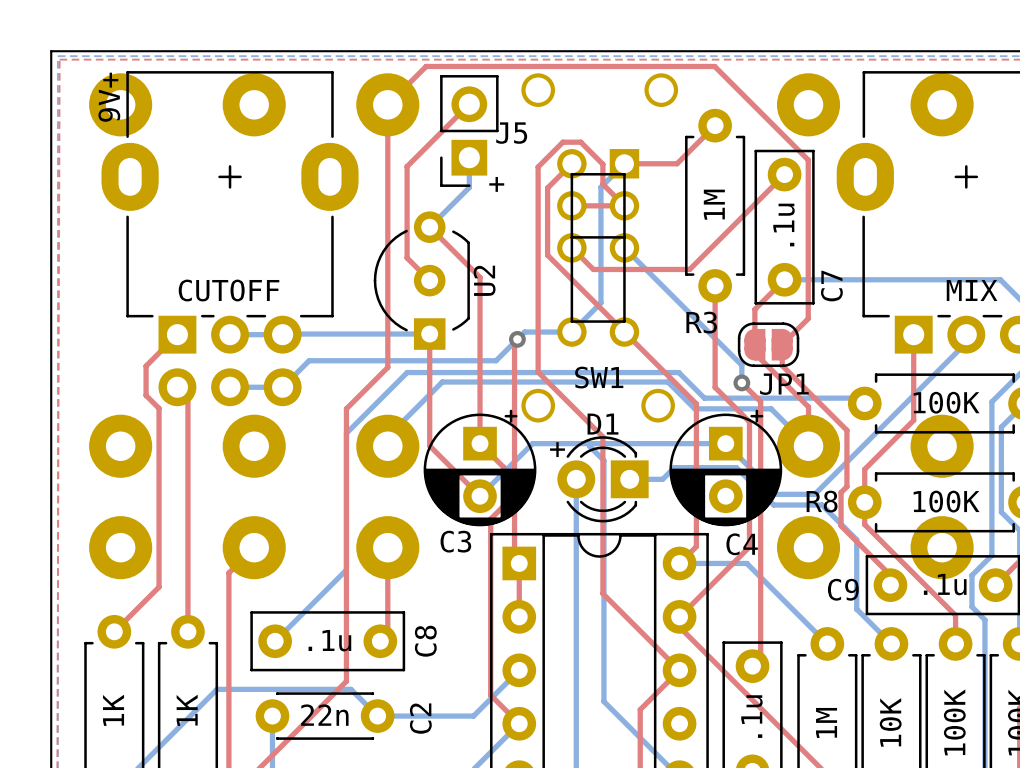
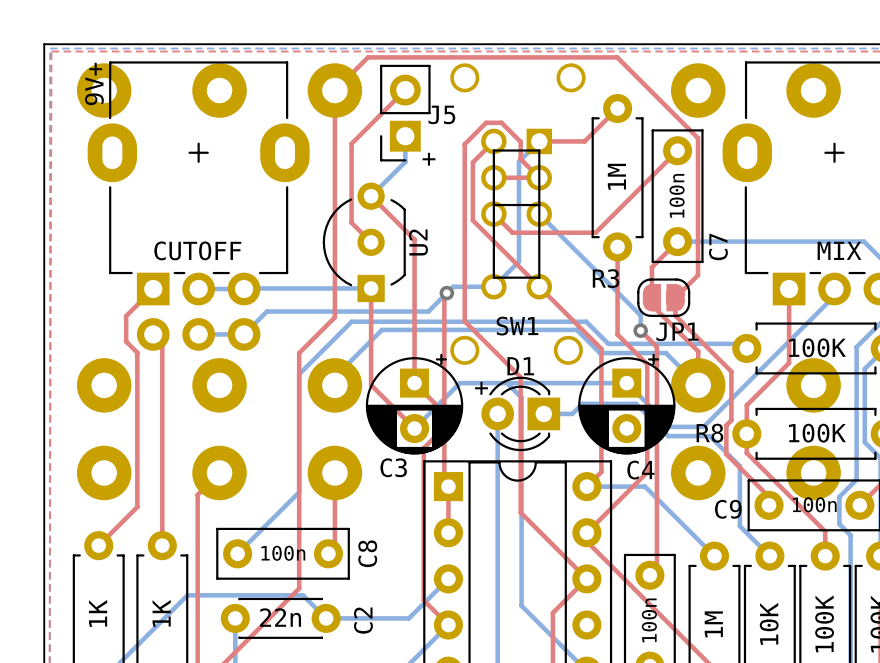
C7 value: .1u (784, 225) -> 100n (677, 195)
C9 value: .1u (945, 584) -> 100n (814, 504)
C8 value: .1u (329, 640) -> 100n (283, 553)
part value: .1u (751, 716) -> 100n (649, 620)

